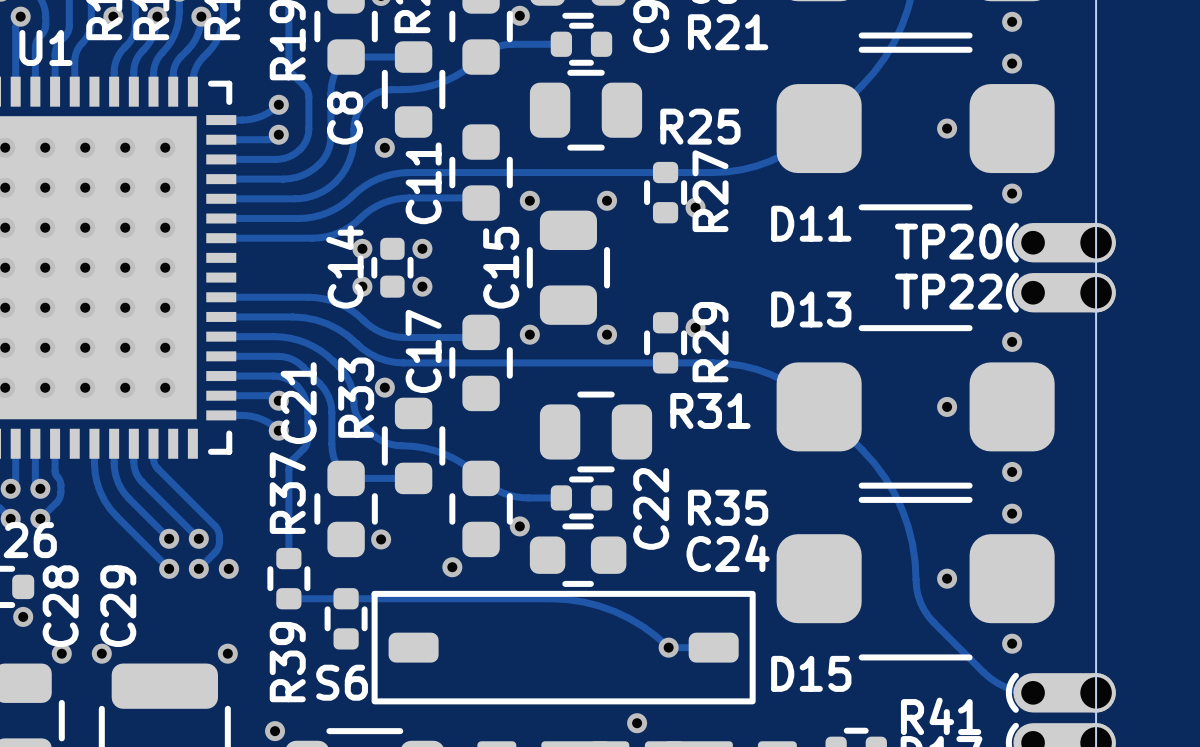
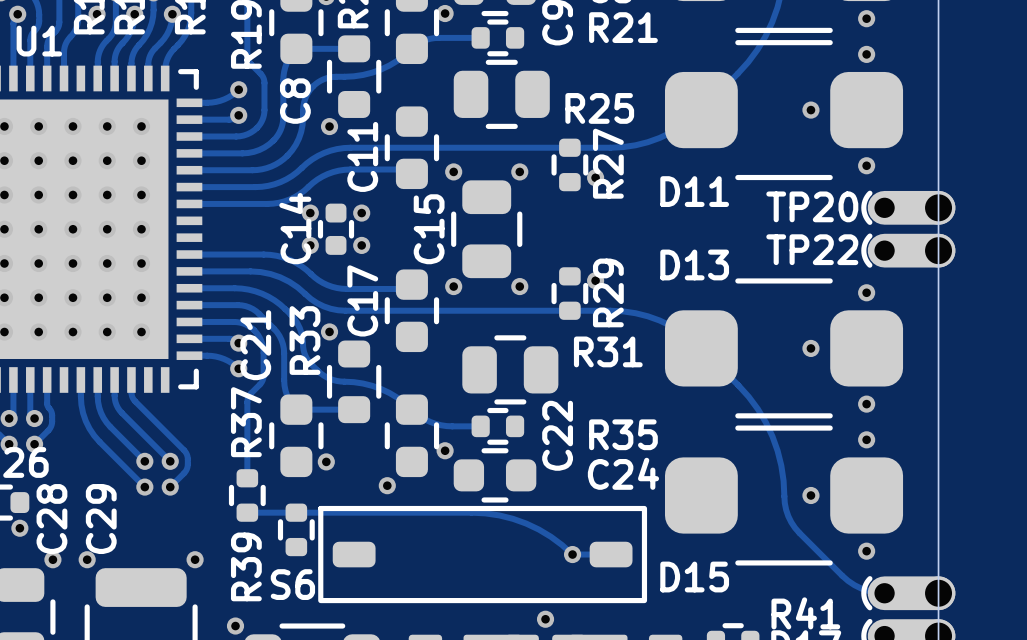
via: (228, 568) -> none

